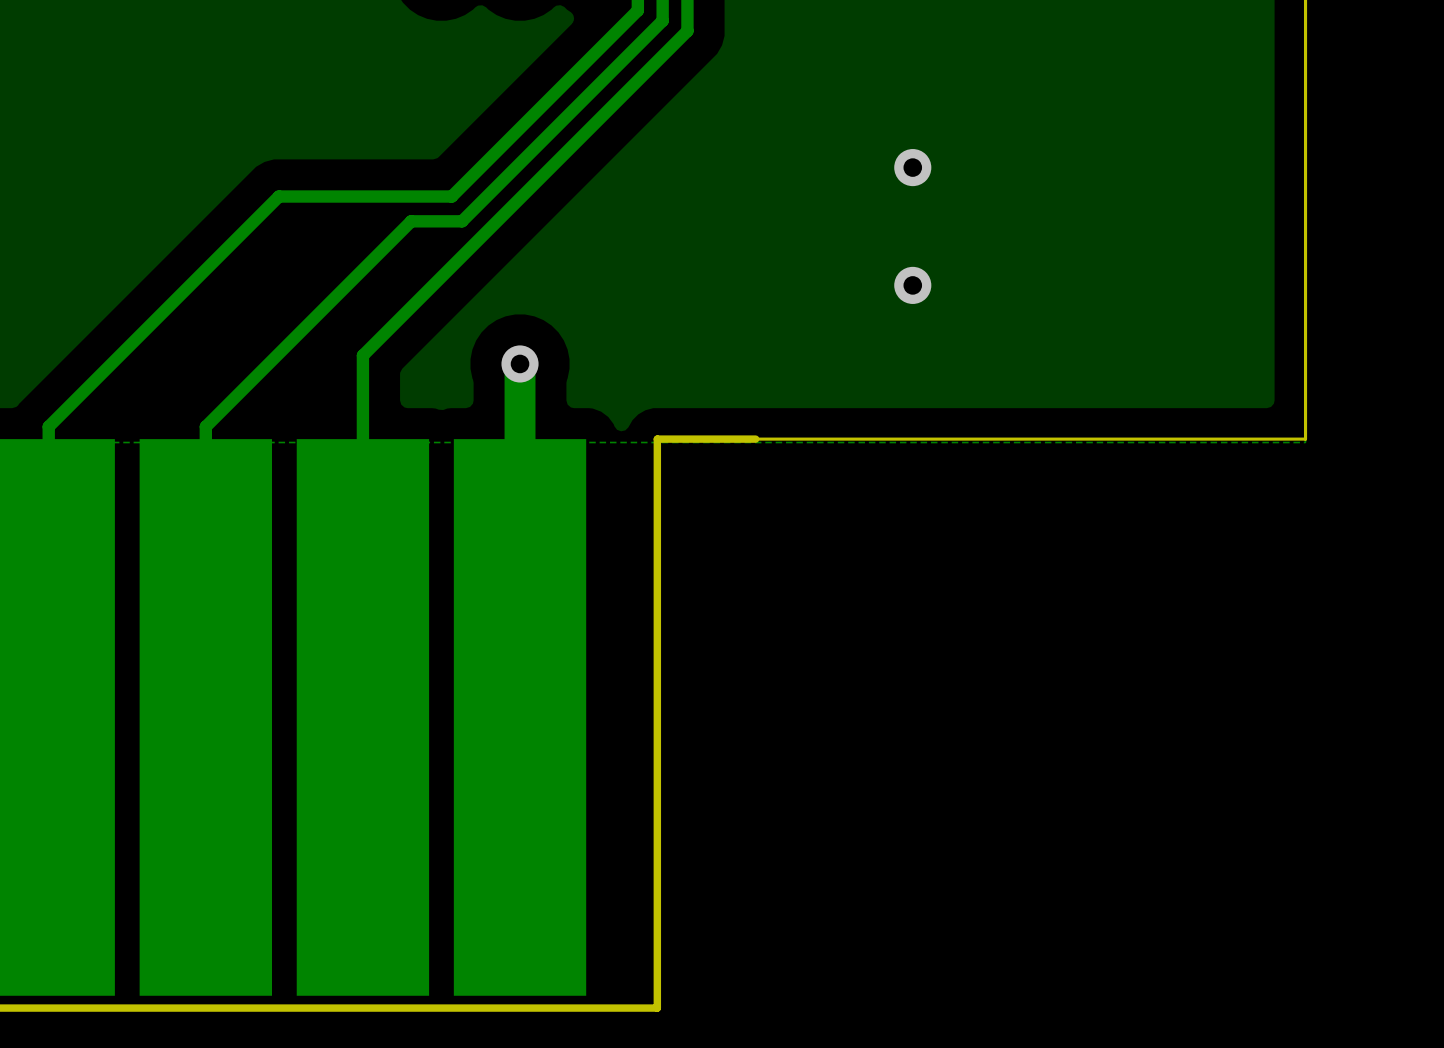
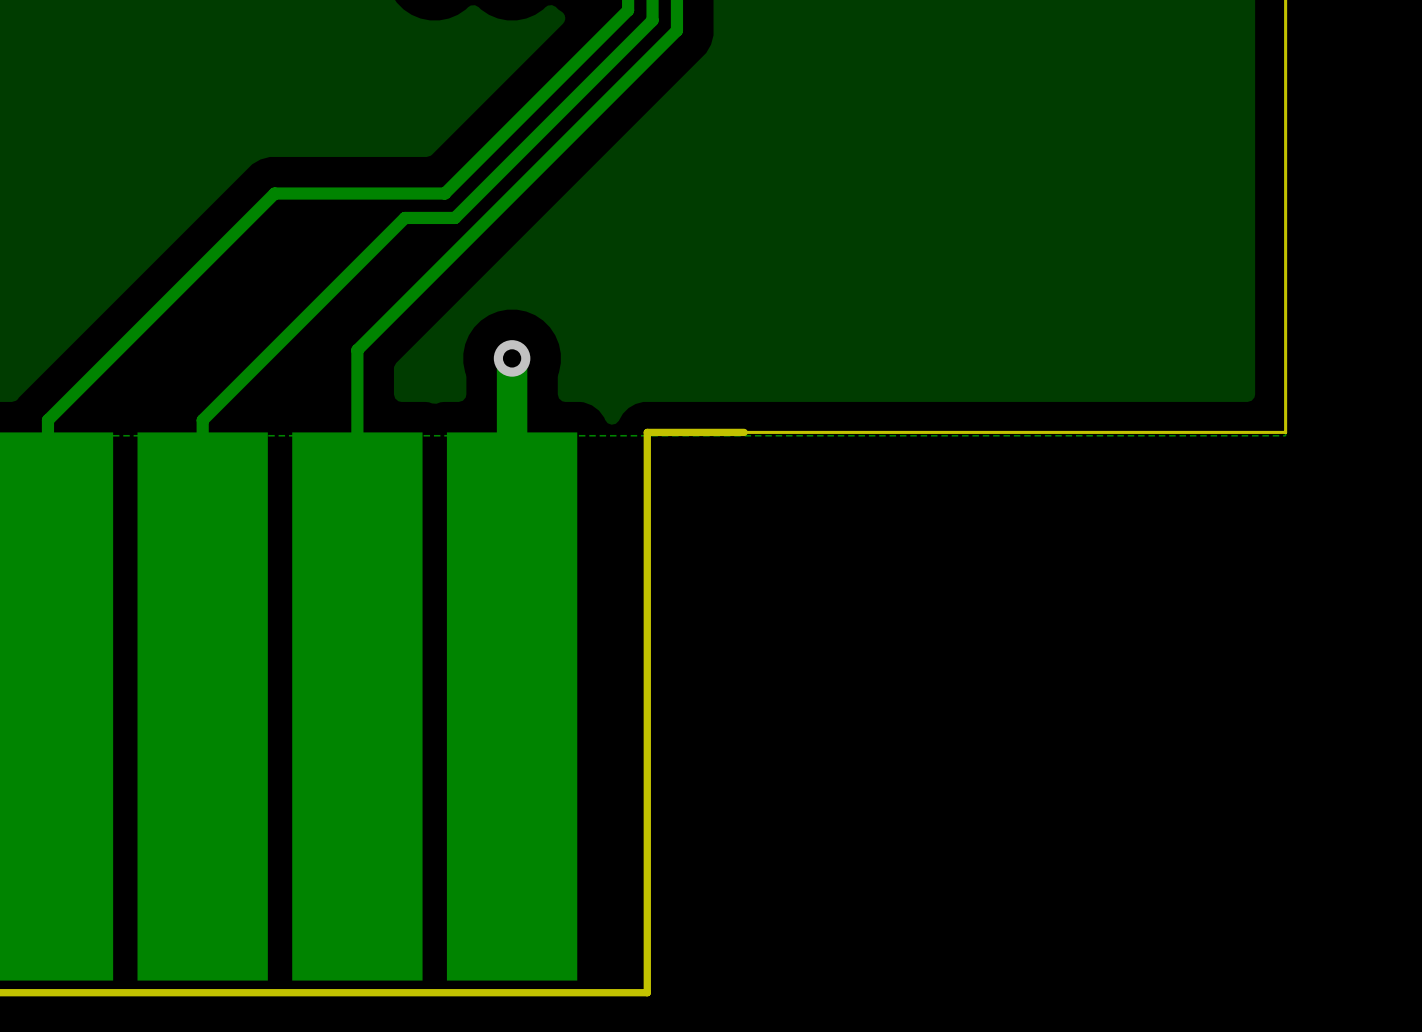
via: (912, 167) -> none
via: (912, 285) -> none

